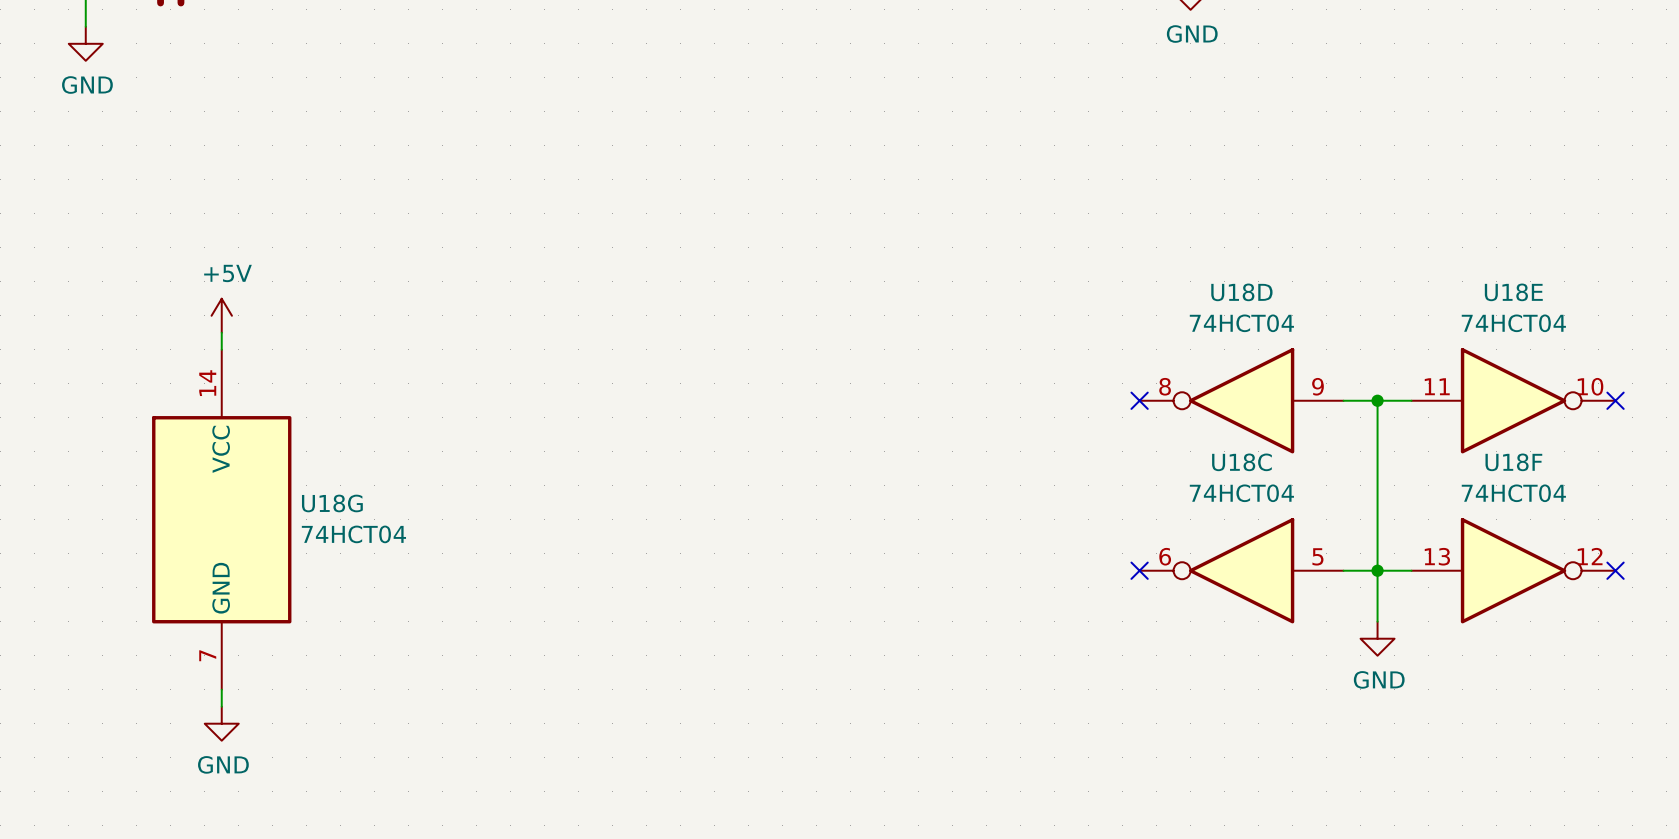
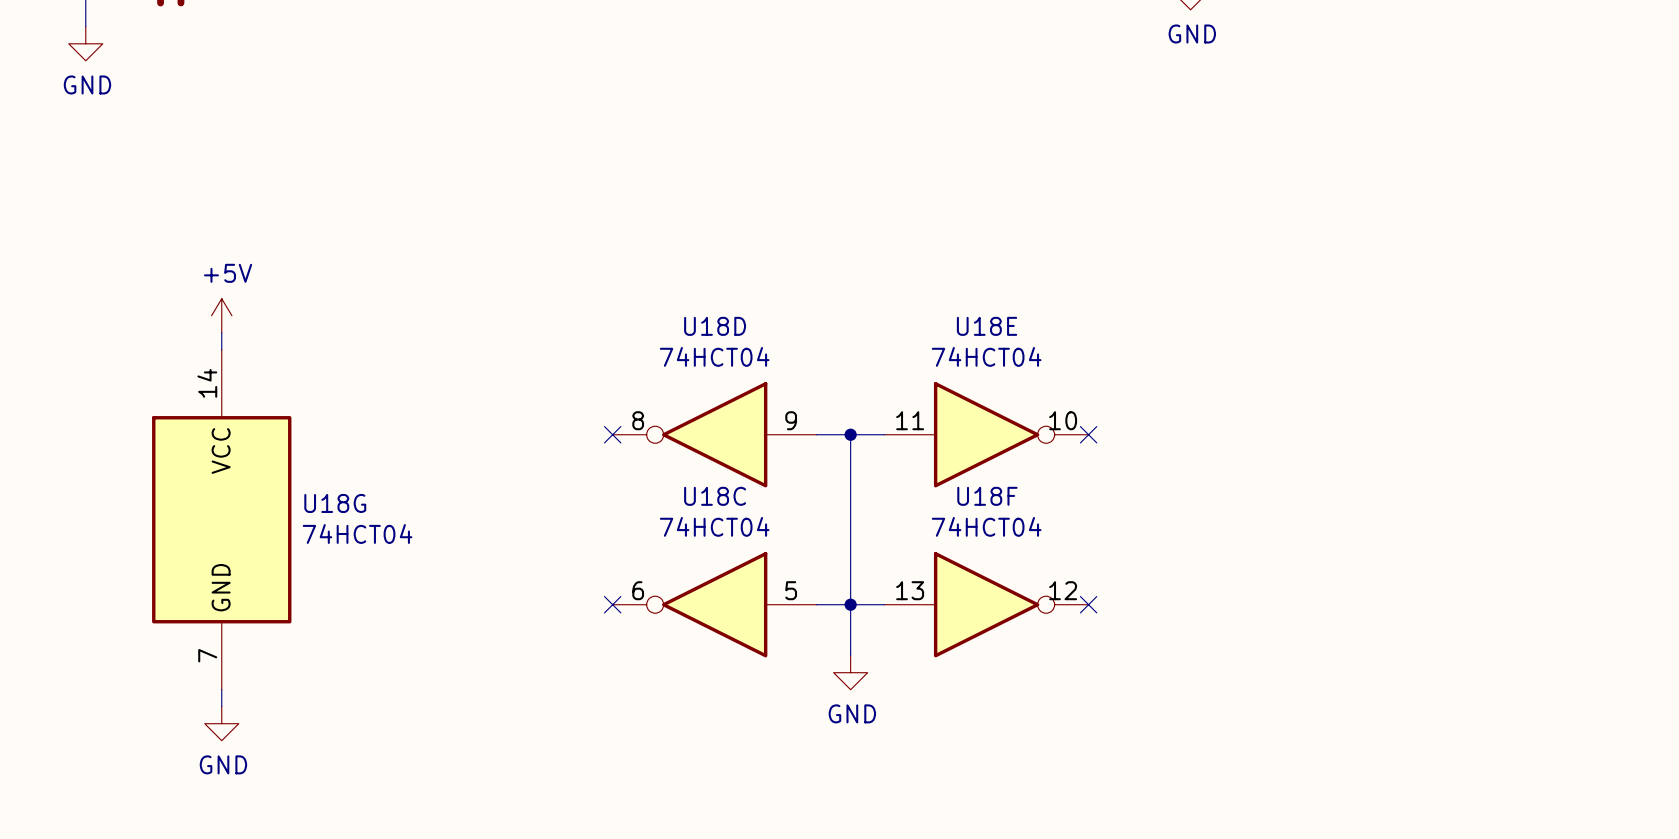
no-connect mark position: (1139, 400) -> (1088, 434)
U18D position: (1241, 400) -> (714, 434)
wire: (1343, 400) (1411, 400) -> none
wire: (1377, 400) (1377, 621) -> none
junction: (1377, 400) -> none
U18E position: (1513, 400) -> (986, 434)
no-connect mark: (1615, 400) -> none
no-connect mark: none -> (612, 434)
wire: none -> (816, 434) (884, 434)
wire: none -> (850, 434) (850, 655)
junction: none -> (850, 434)
no-connect mark position: (1139, 570) -> (1088, 604)
U18C position: (1241, 570) -> (714, 604)
wire: (1343, 570) (1411, 570) -> none
junction: (1377, 570) -> none
U18F position: (1513, 570) -> (986, 604)
no-connect mark: (1615, 570) -> none
no-connect mark: none -> (612, 604)
wire: none -> (816, 604) (884, 604)
junction: none -> (850, 604)
power symbol: GND (1377, 638) -> none
power symbol: none -> GND (850, 672)

